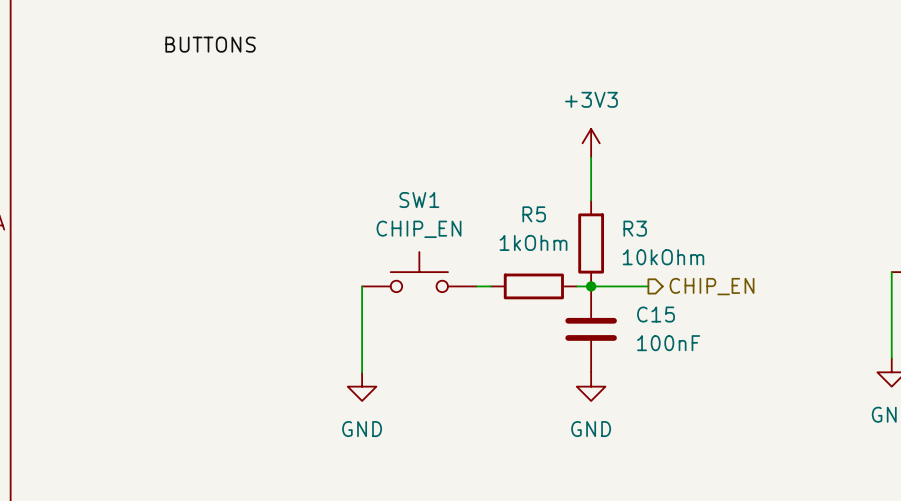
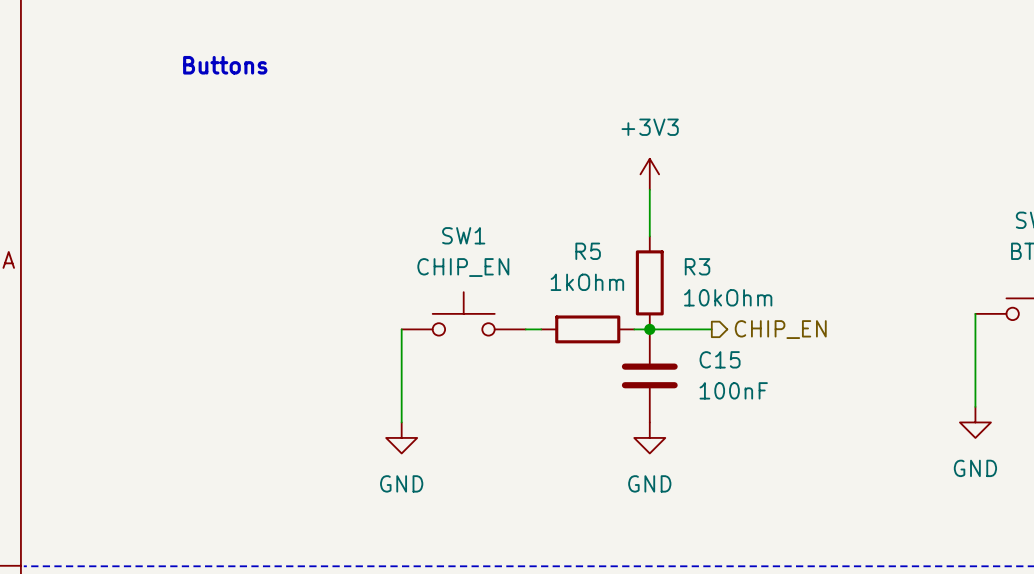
text: none -> Buttons (225, 65)
label: BUTTONS (210, 44) -> none

